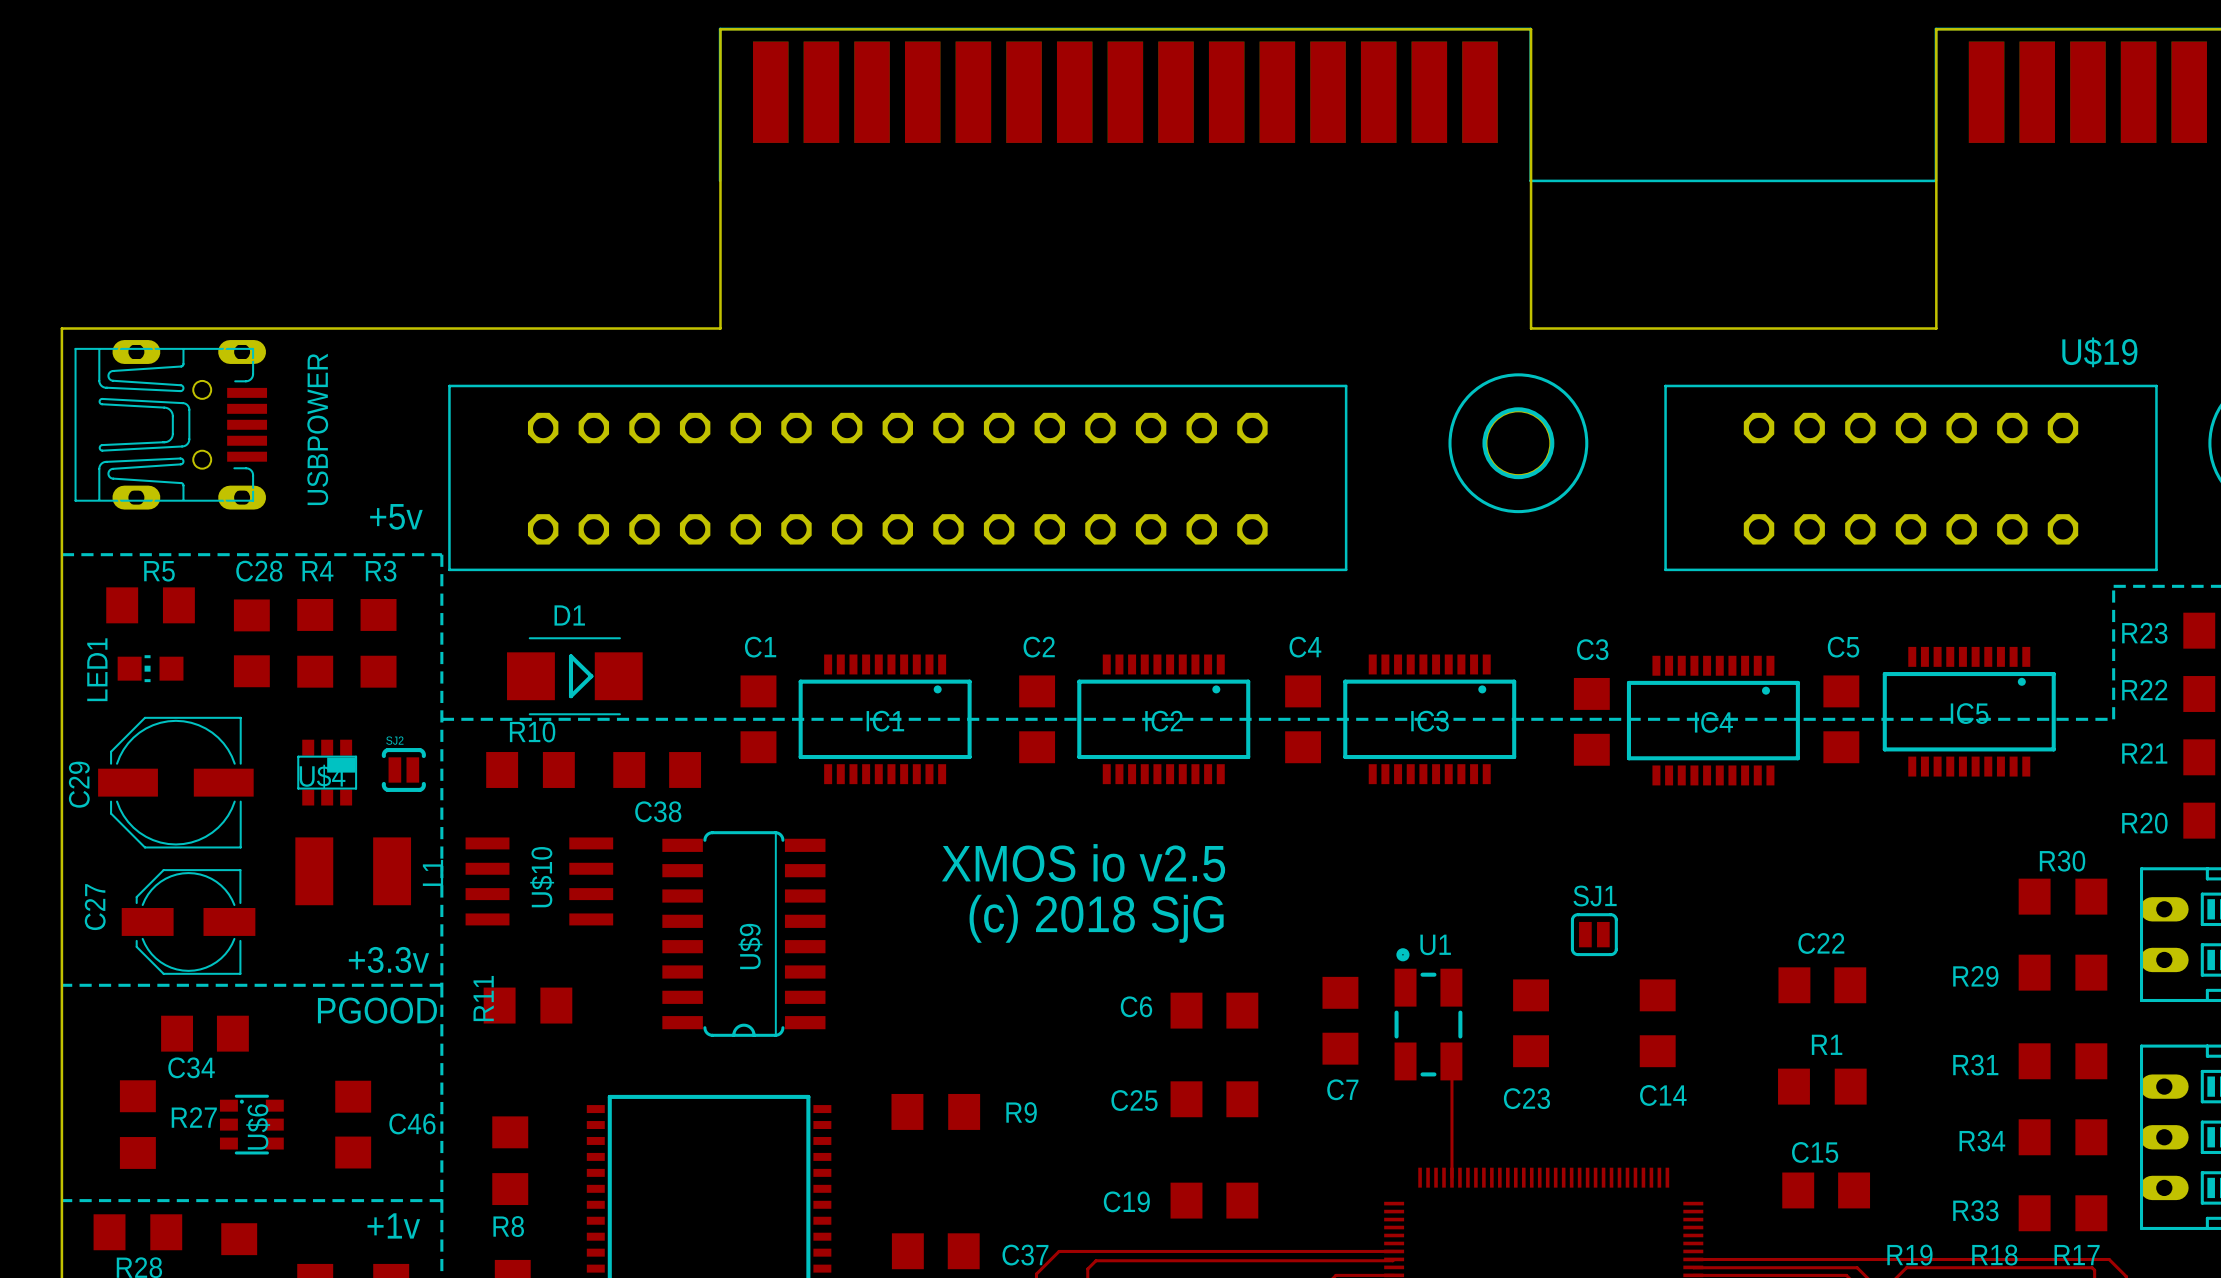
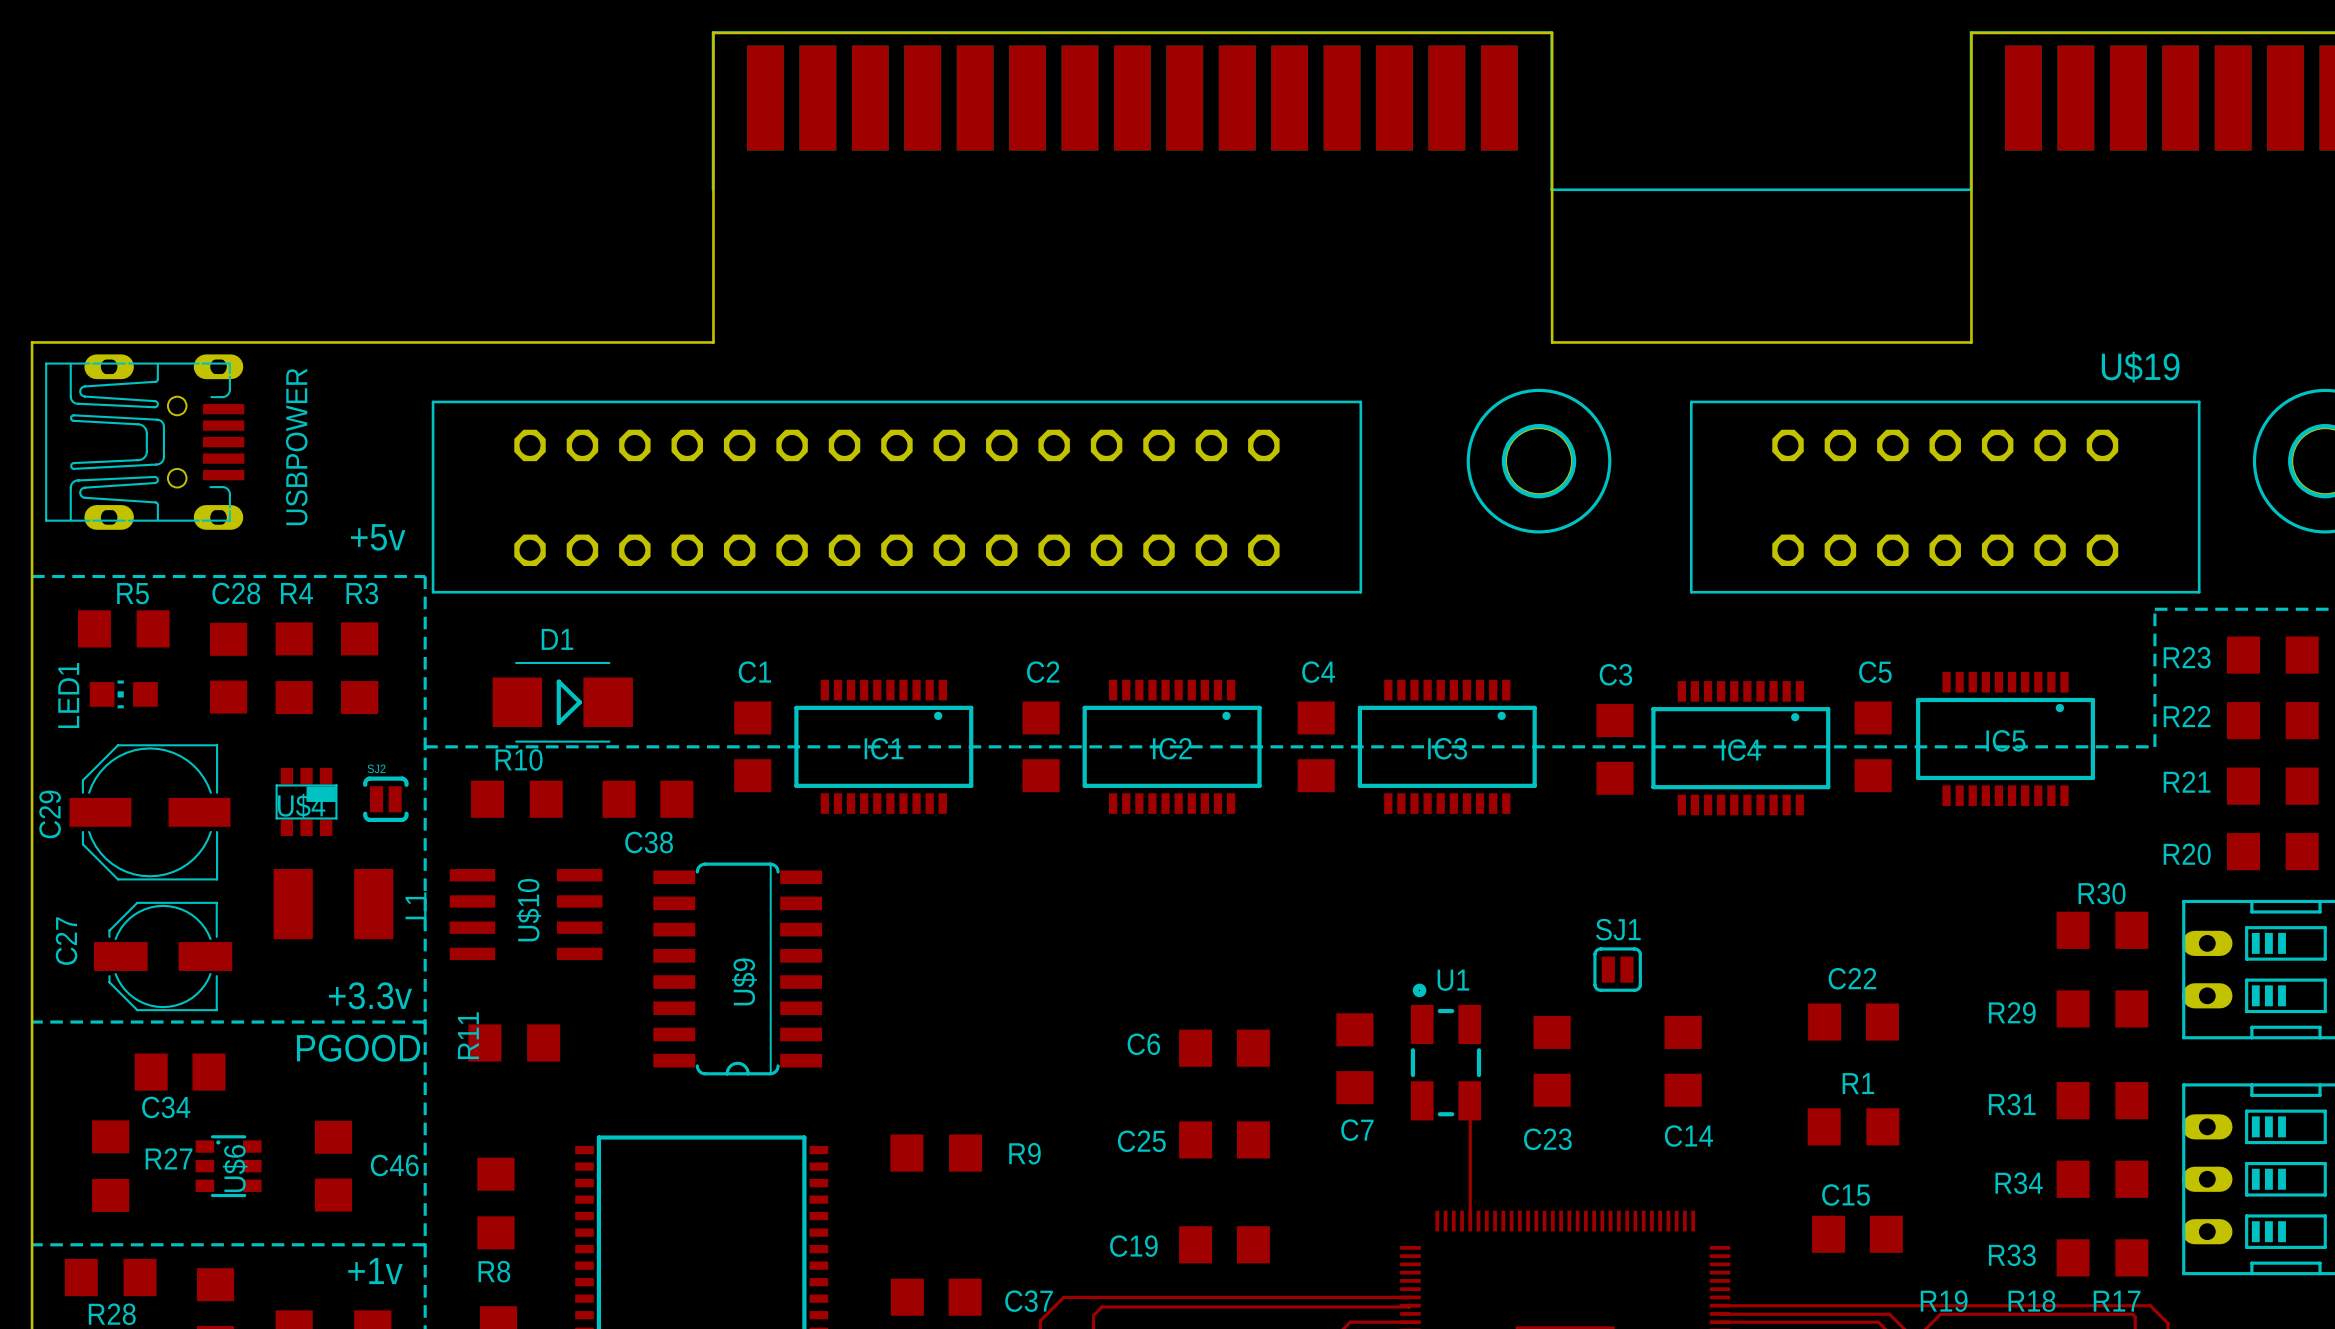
text: XMOS io v2.5 (1083, 863) -> none
text: (c) 2018 SjG (1096, 918) -> none

